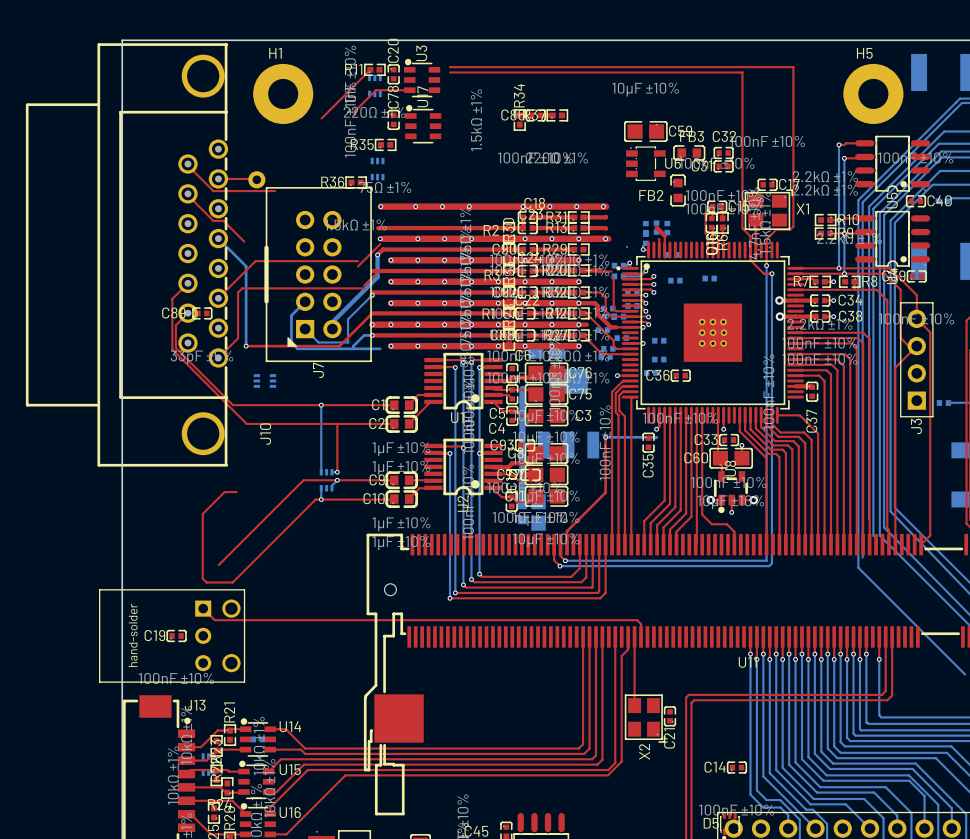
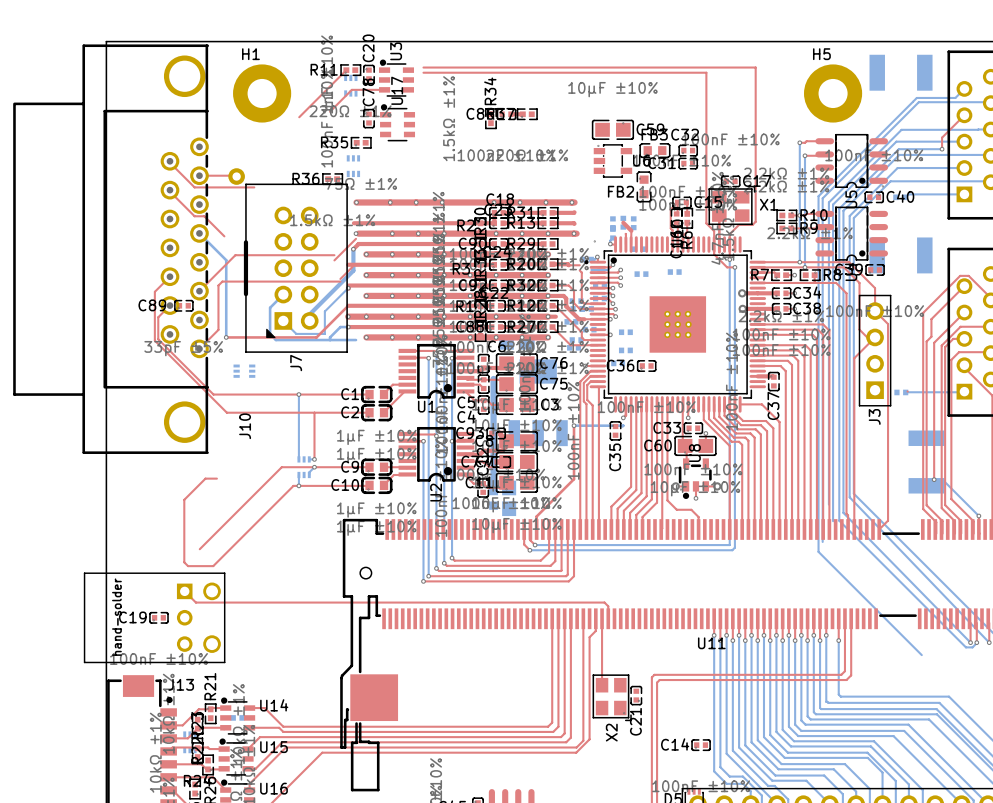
part: (619, 276) -> none

